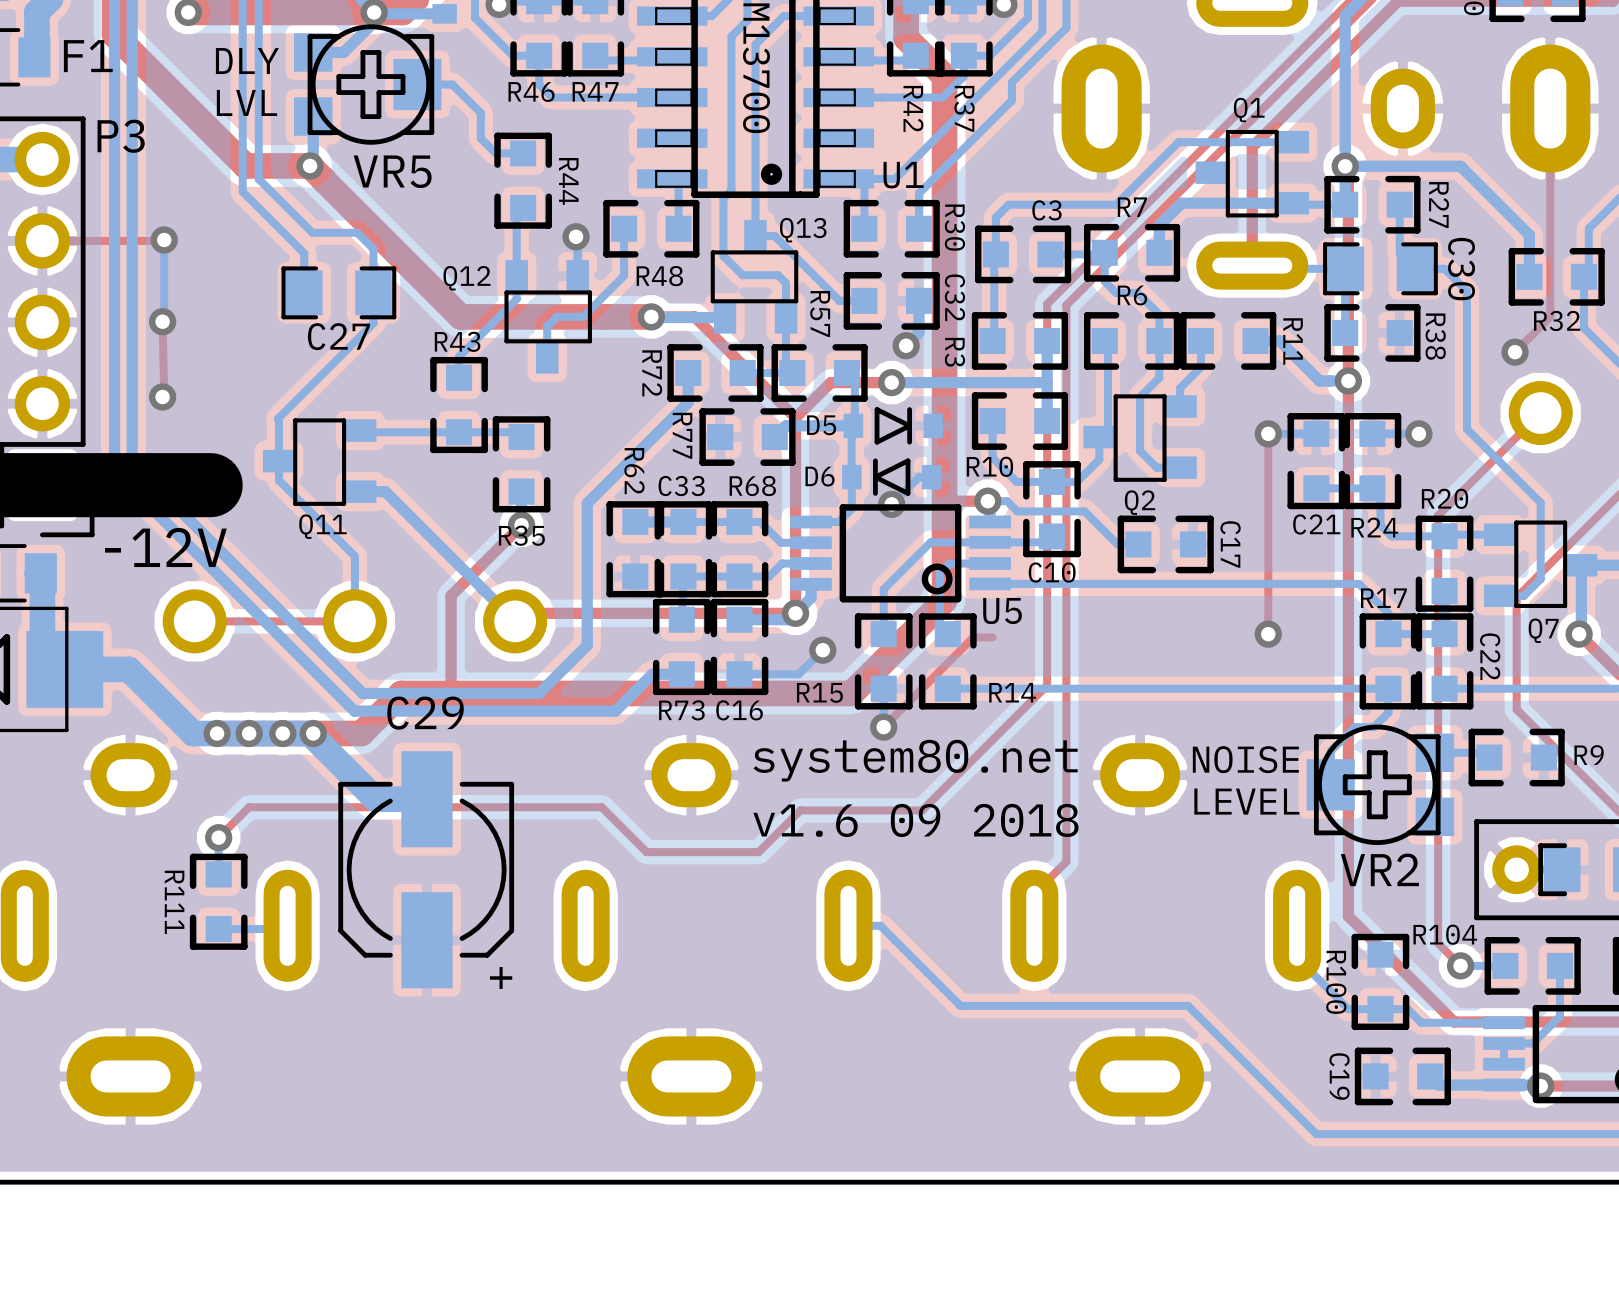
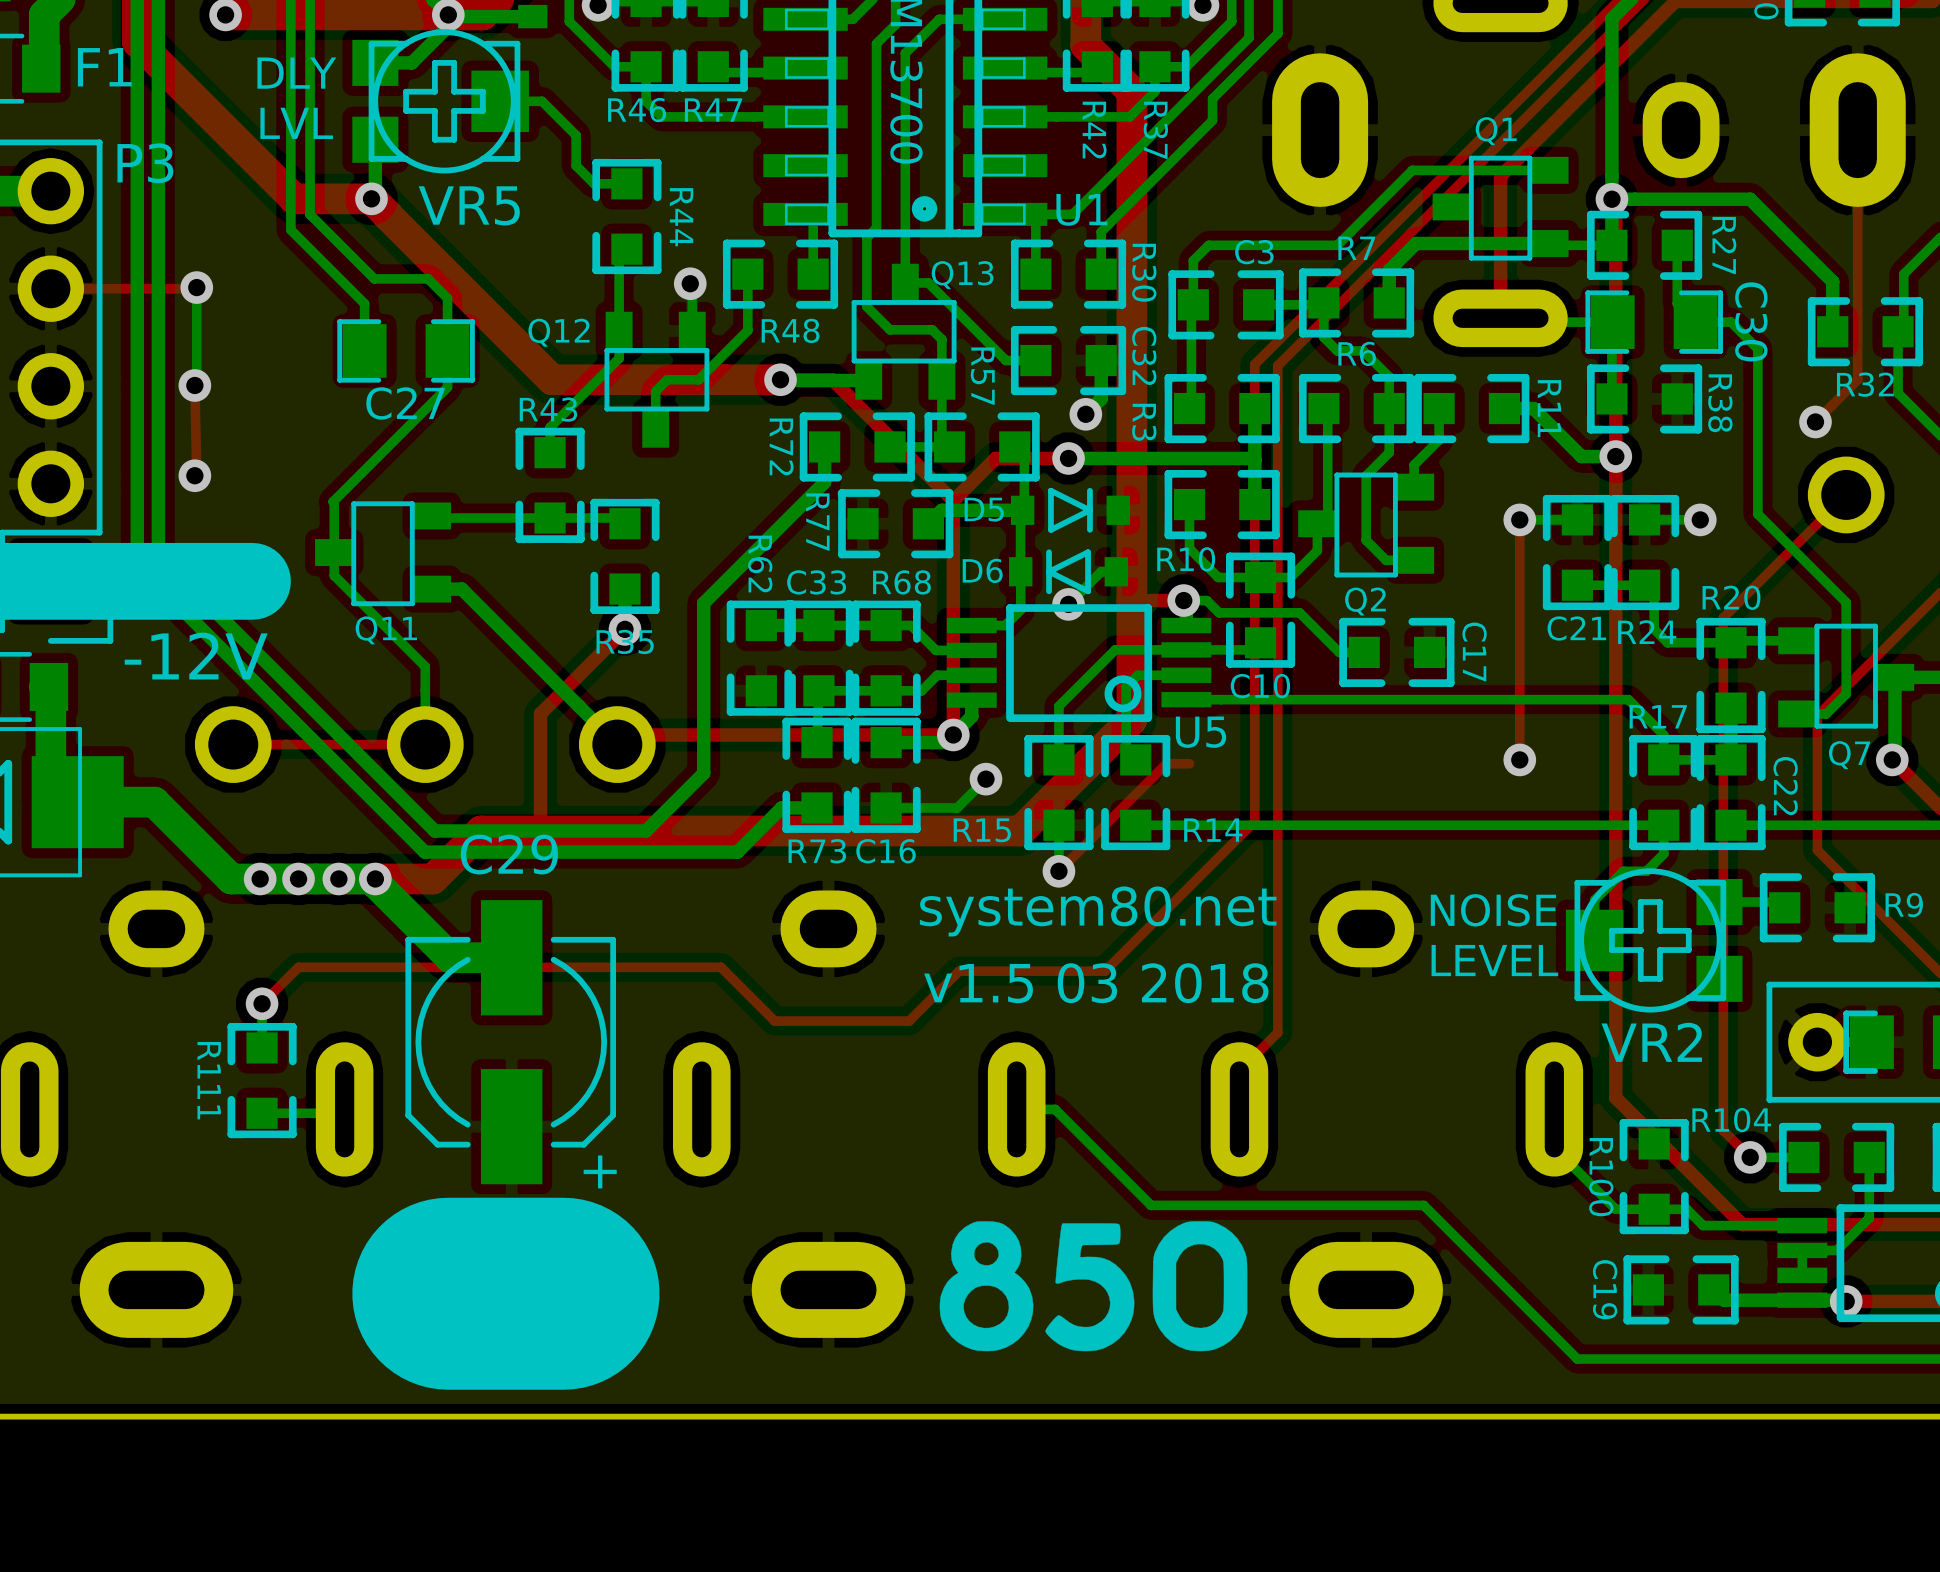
text: v1.6 09 2018 (915, 820) -> v1.5 03 2018 (1096, 983)
drawing: none -> [939, 1221, 1248, 1352]
line: none -> (563, 1293) (448, 1293)

